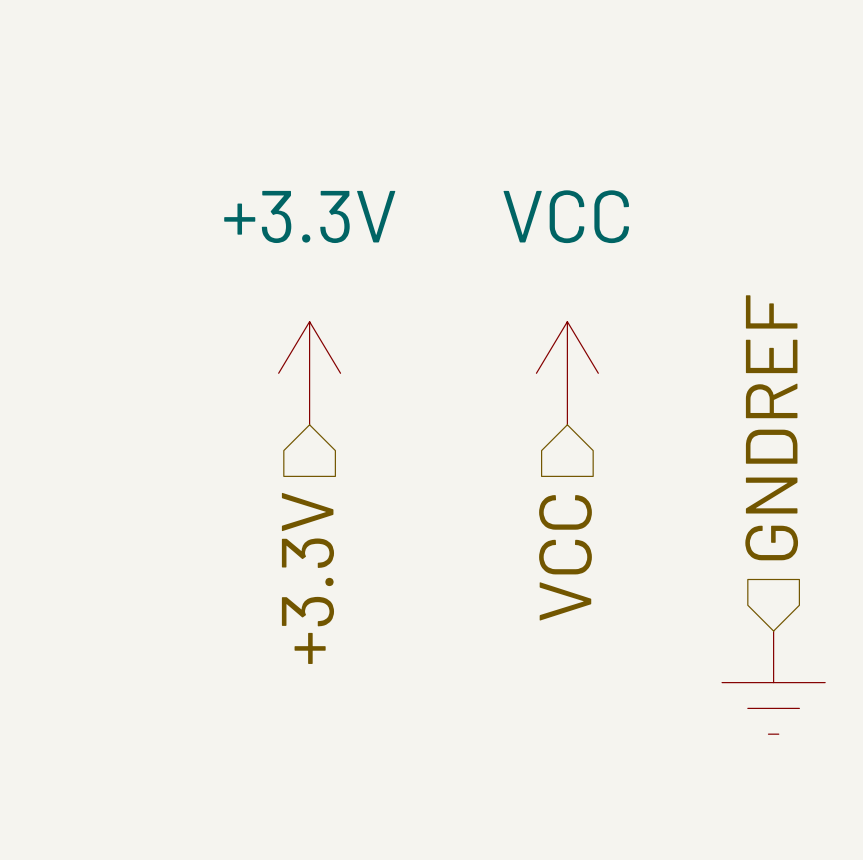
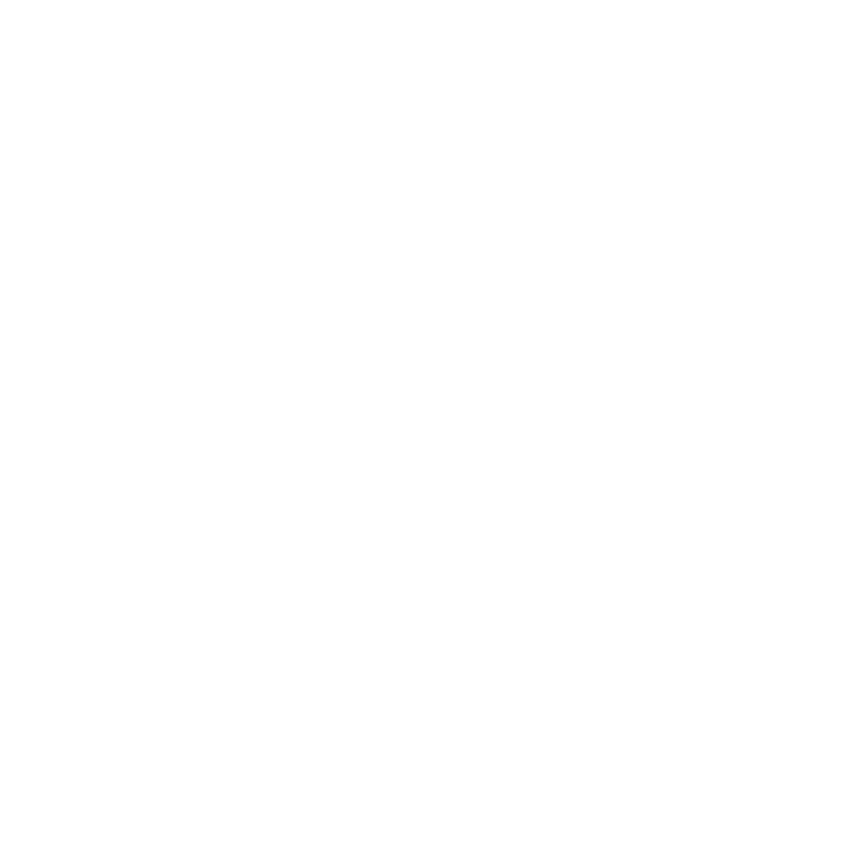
power symbol: +3.3V (309, 373) -> none
power symbol: VCC (567, 373) -> none
hierarchical label: GNDREF (771, 427) -> none
hierarchical label: VCC (565, 557) -> none
hierarchical label: +3.3V (307, 578) -> none
power symbol: (773, 682) -> none

